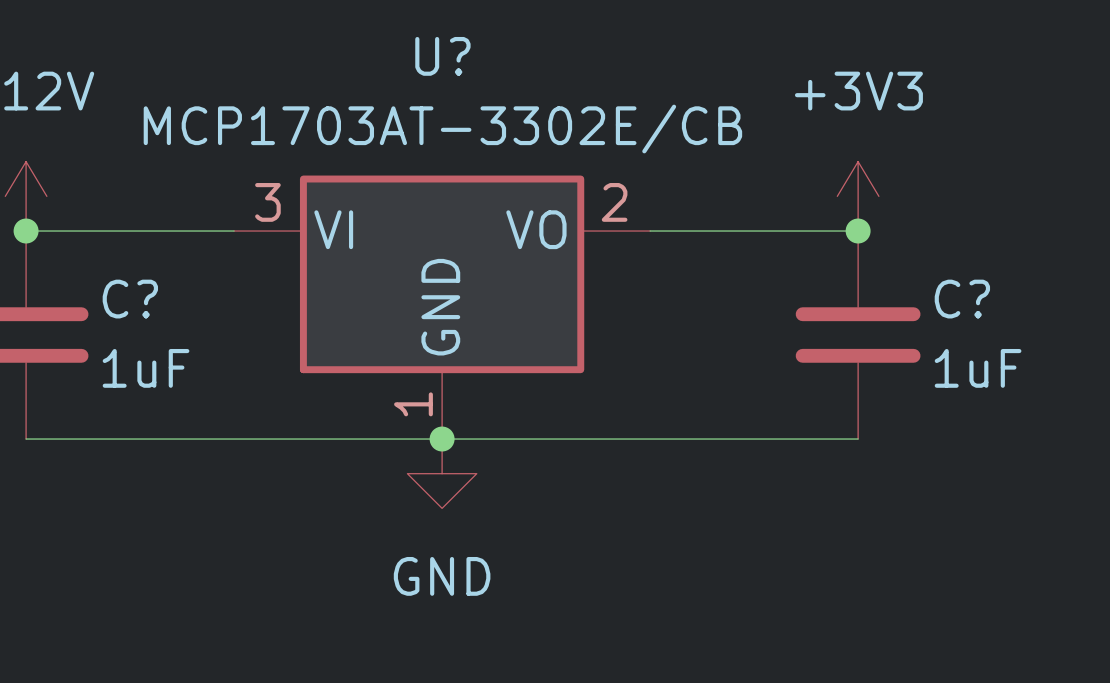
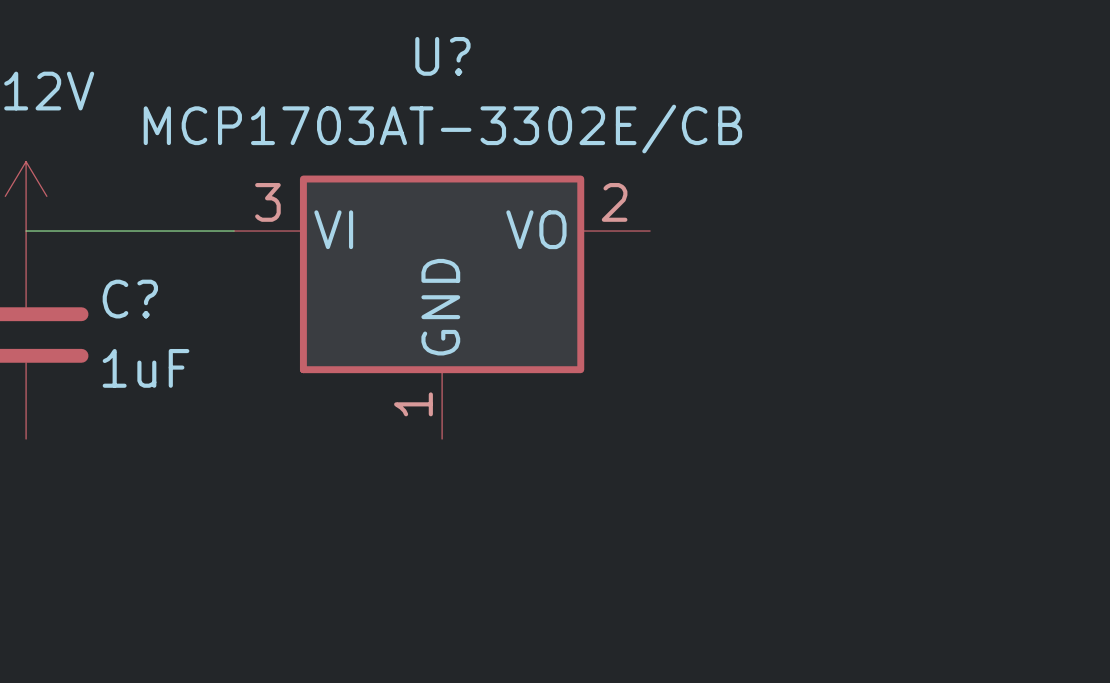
power symbol: +3V3 (858, 196) -> none
junction: (26, 231) -> none
wire: (650, 231) (858, 231) -> none
junction: (858, 231) -> none
C?: 1uF (858, 335) -> none
wire: (26, 439) (858, 439) -> none
junction: (442, 439) -> none
power symbol: GND (442, 473) -> none

